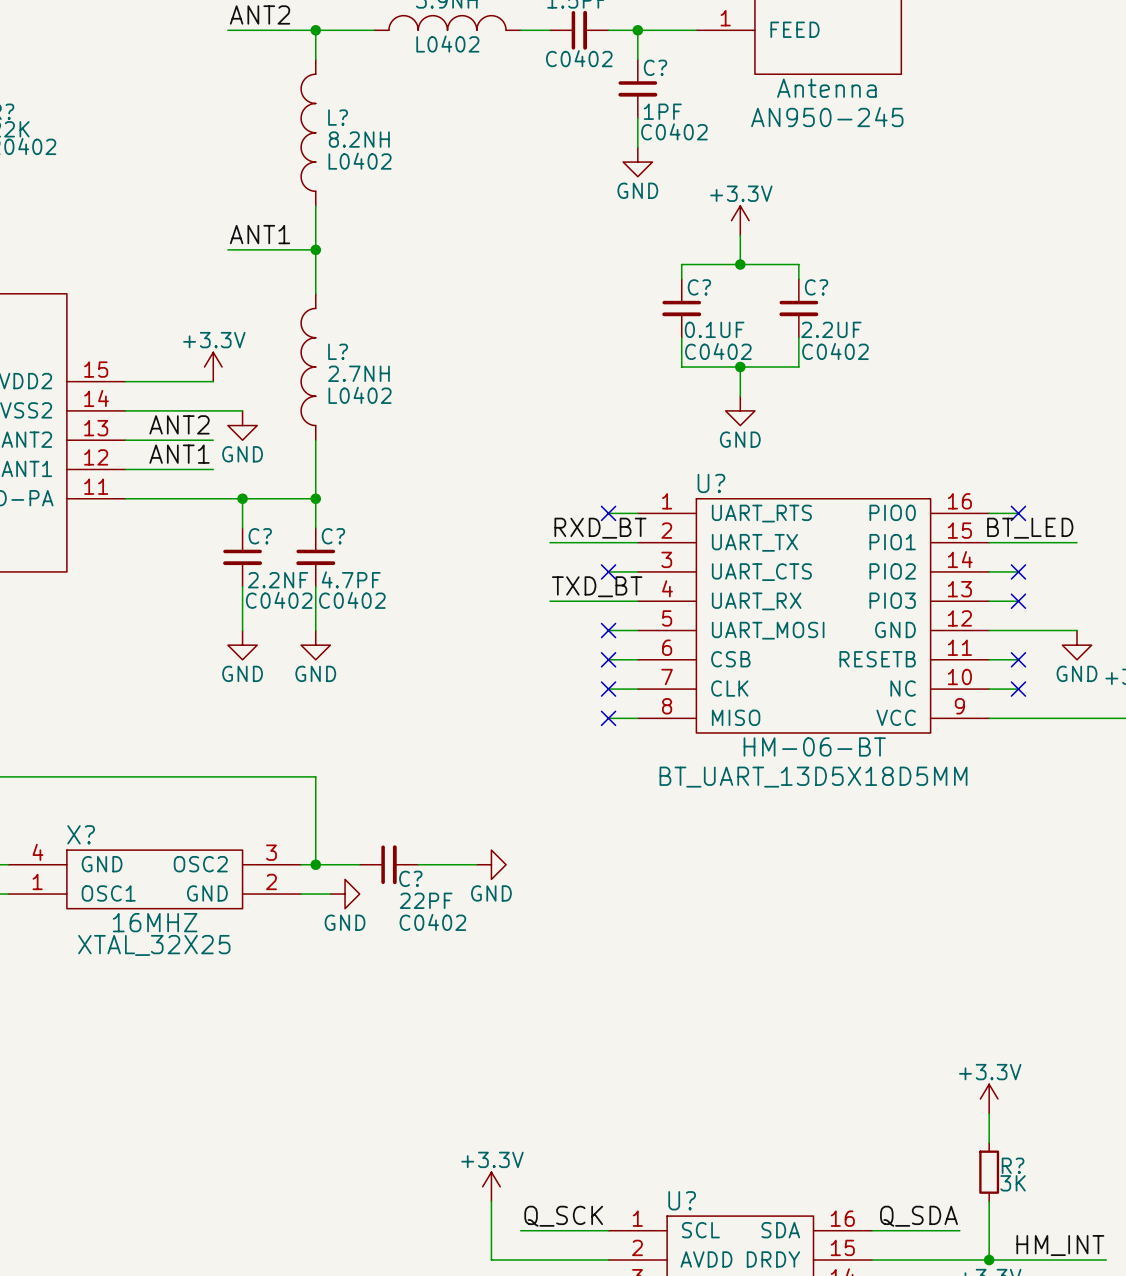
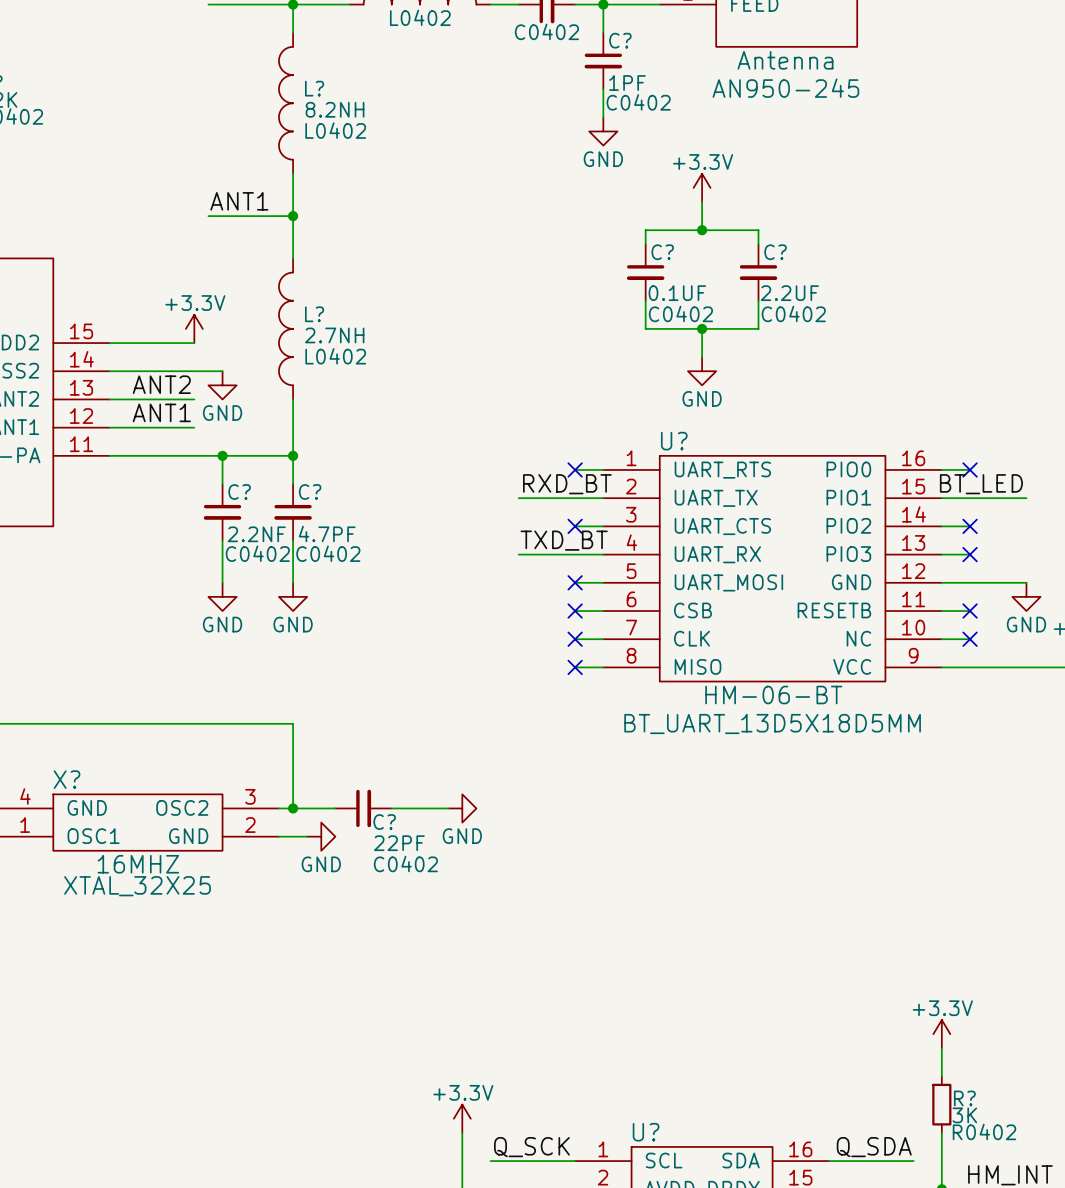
R? text: none -> R0402 (984, 1131)

